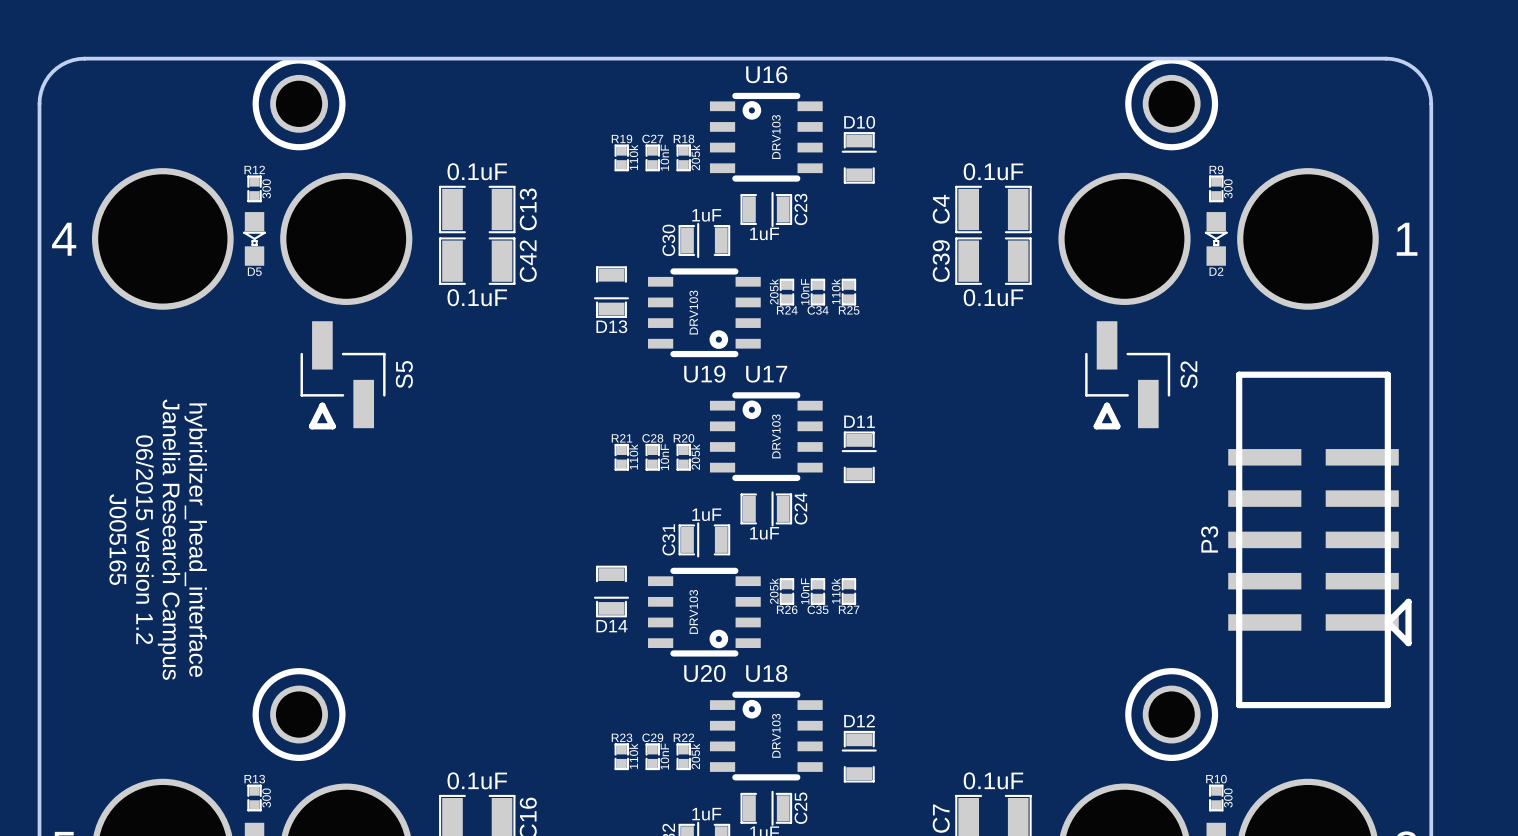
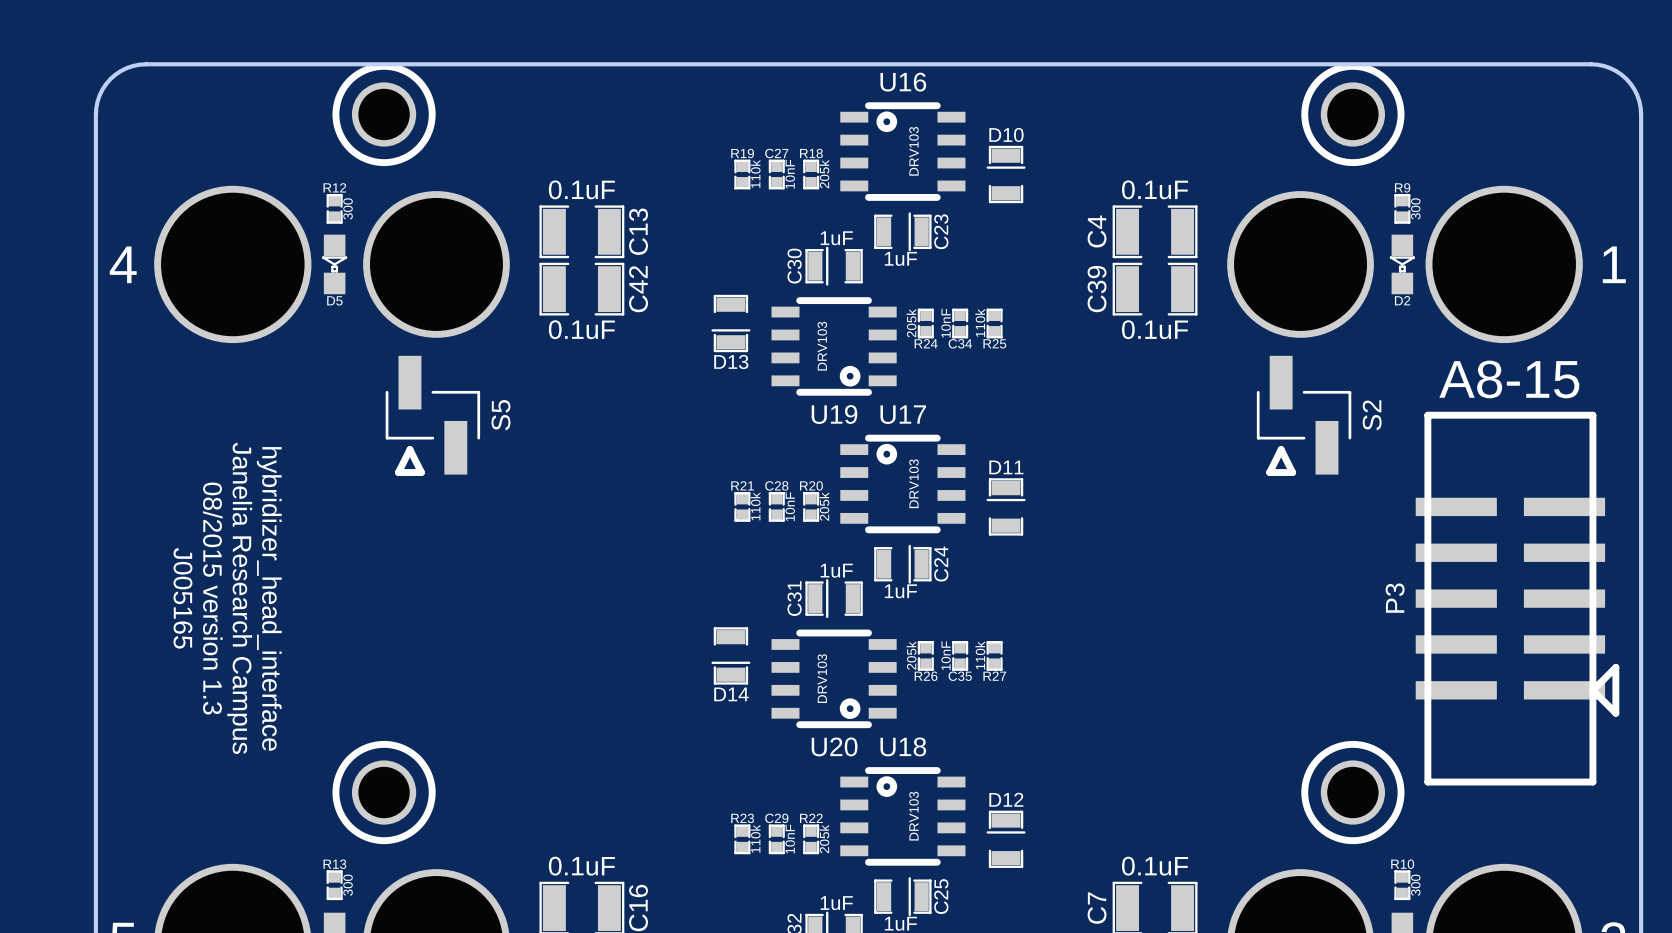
text: none -> A8-15 (1509, 379)
text: 06/2015 version 1.2 (144, 539) -> 08/2015 version 1.3 (212, 598)

